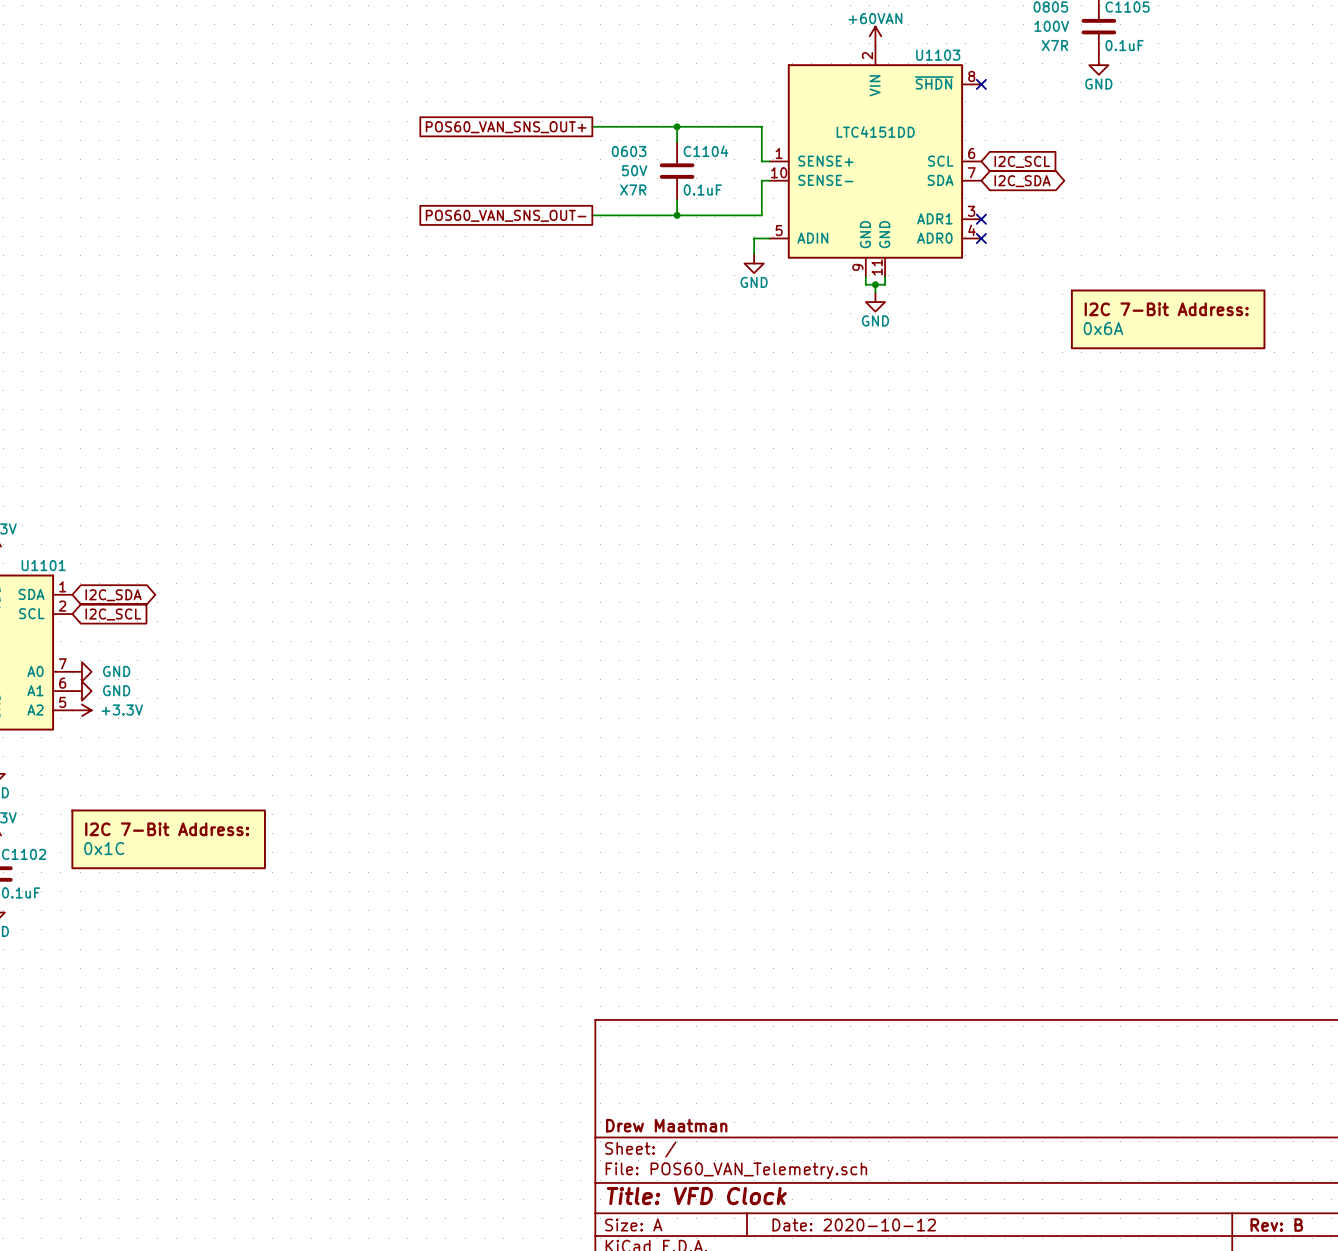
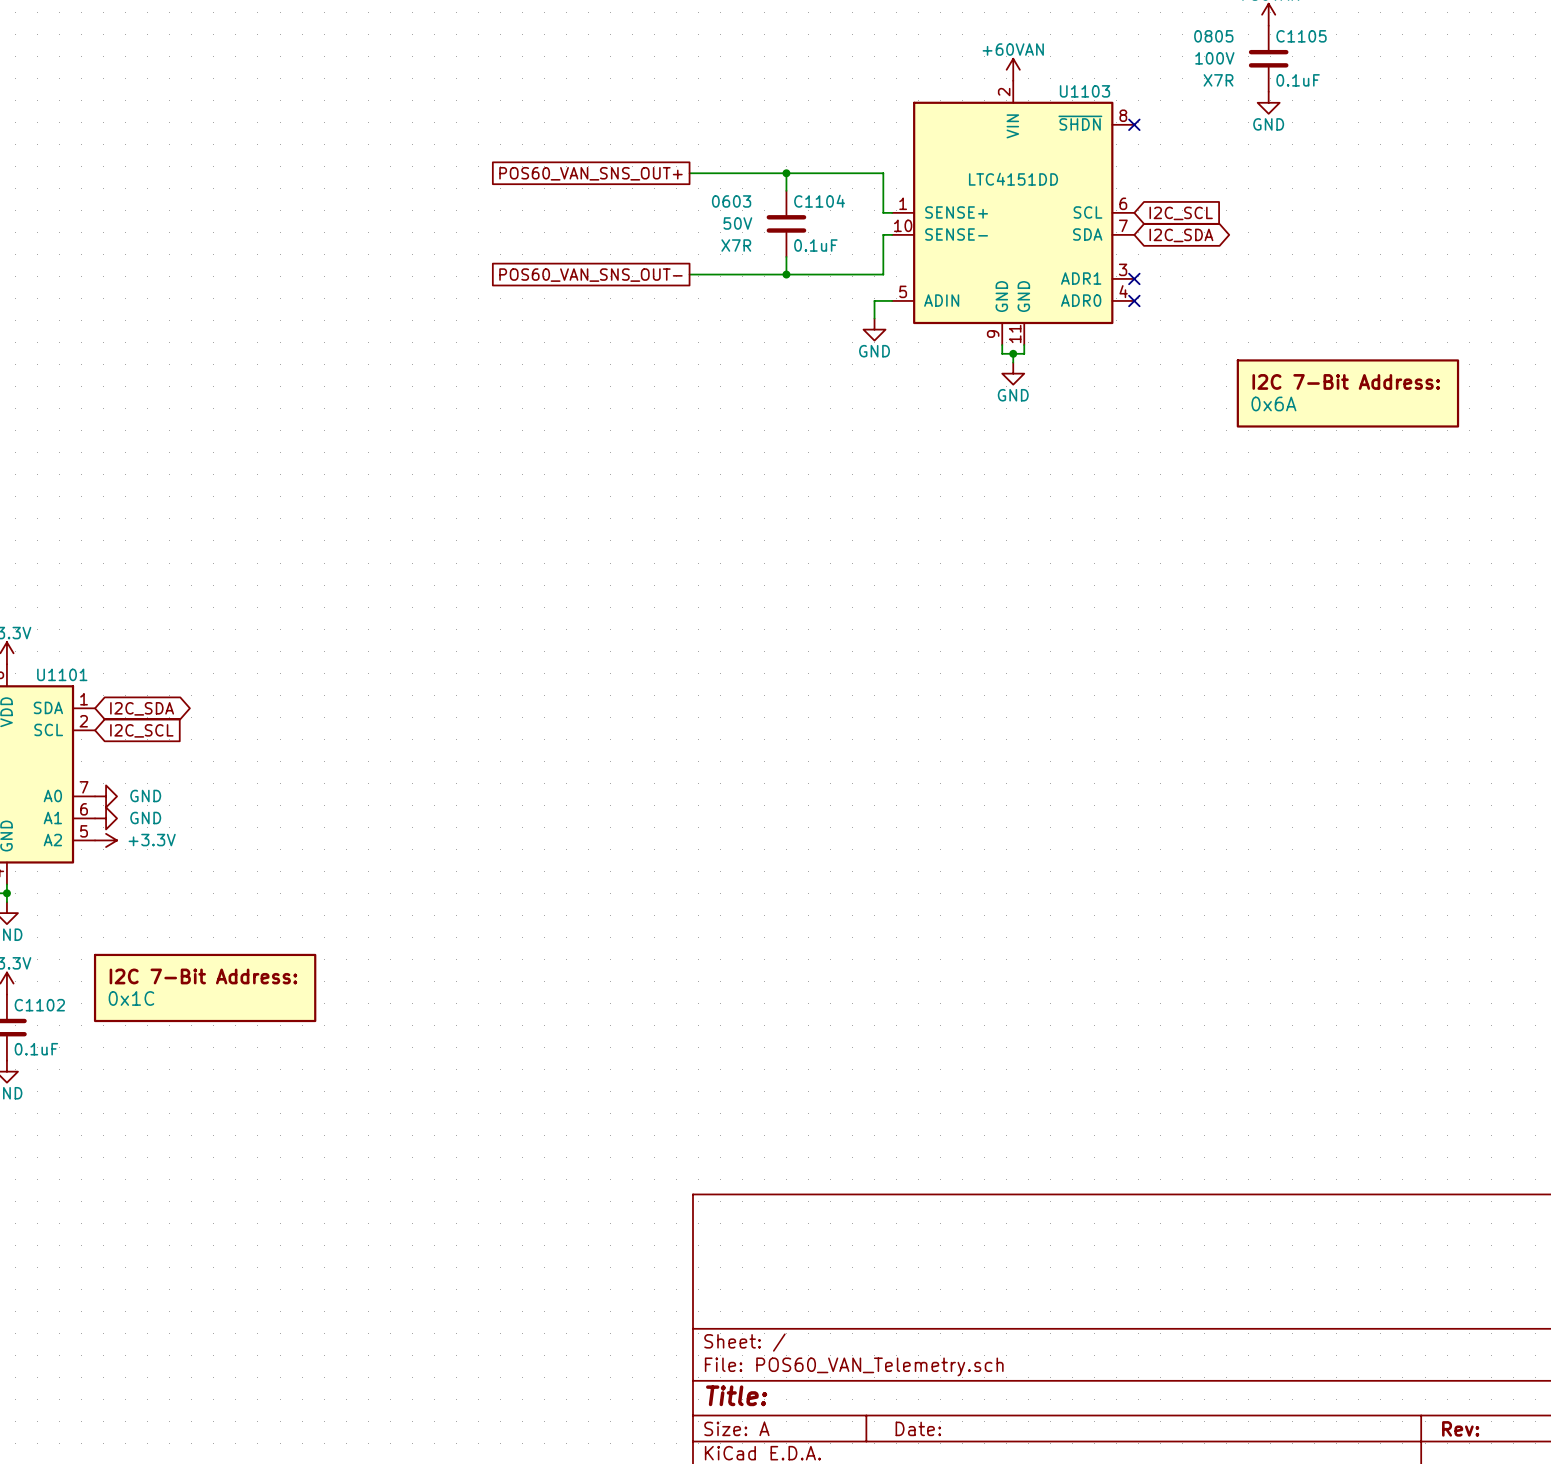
title block: Drew Maatman (666, 1125) -> none
title block: Title: VFD Clock (696, 1196) -> Title: (736, 1395)
title block: Date: 2020-10-12 (854, 1225) -> Date: (918, 1428)
title block: Rev: B (1276, 1225) -> Rev: (1460, 1428)

